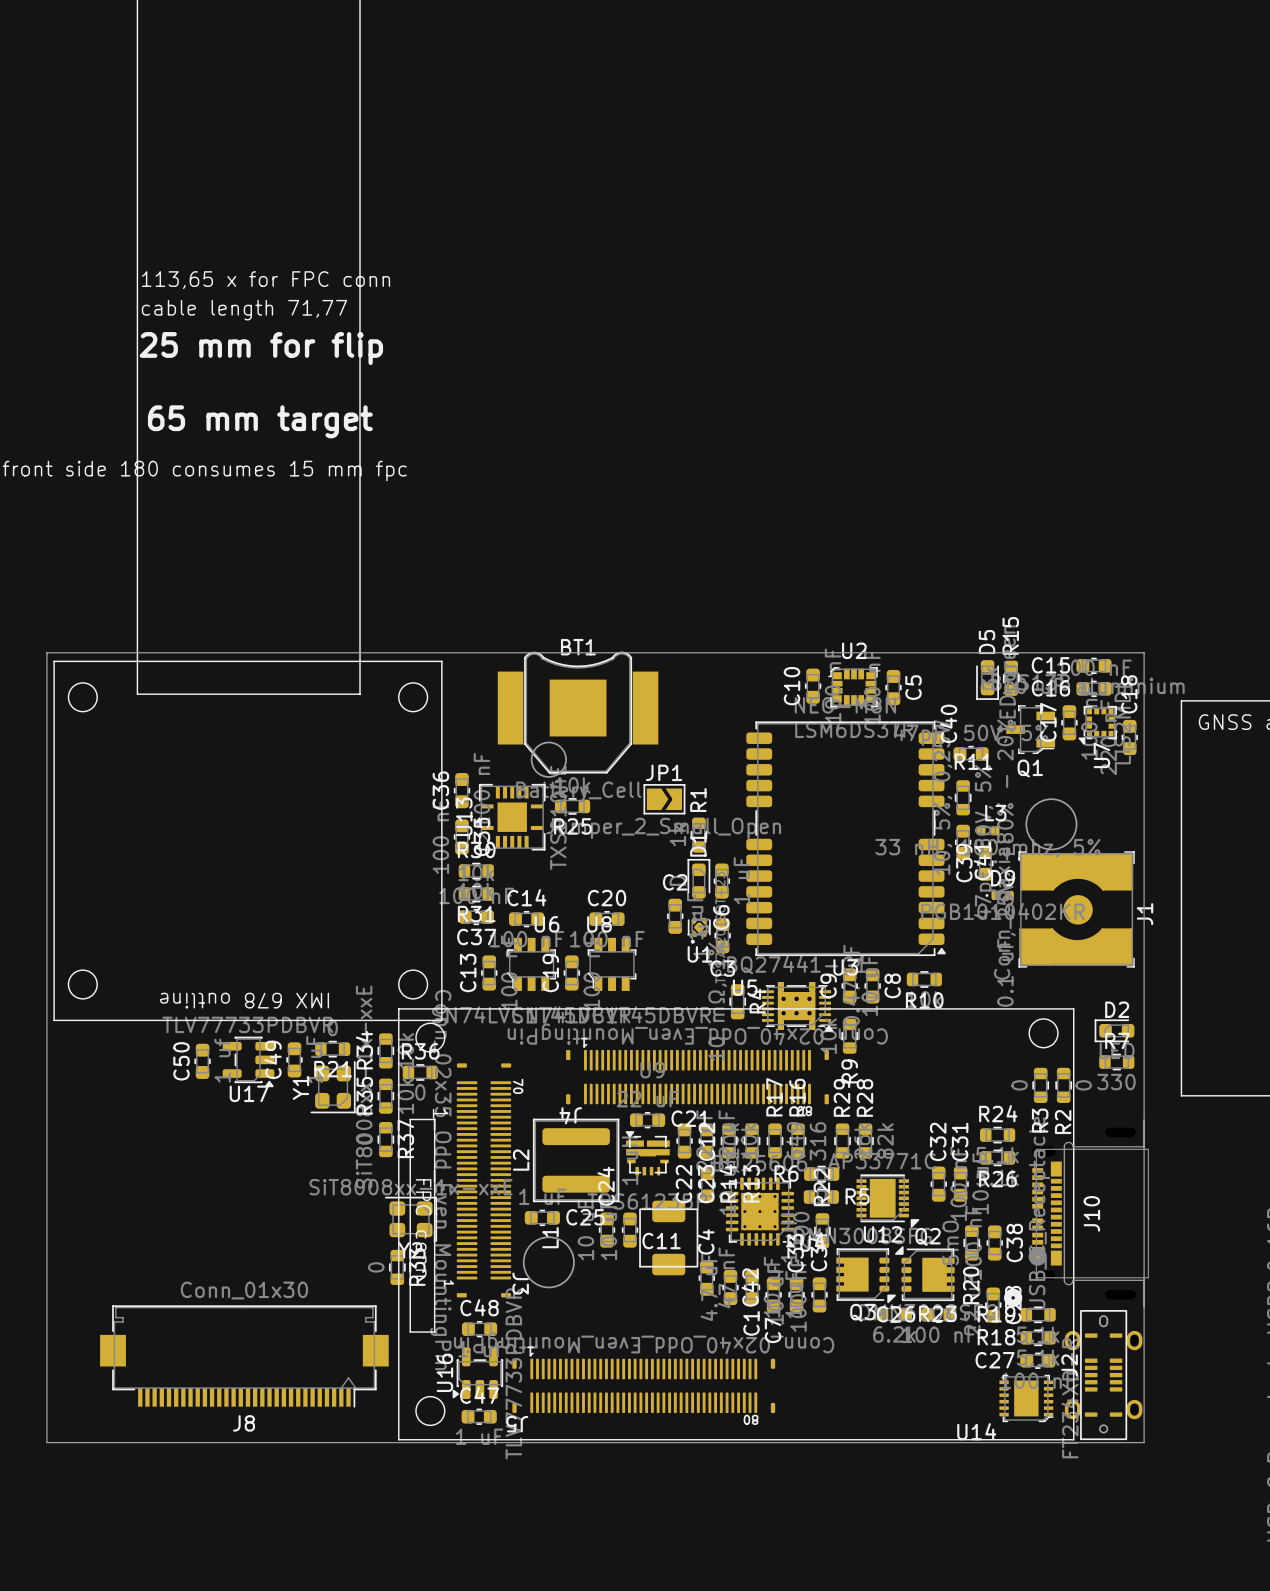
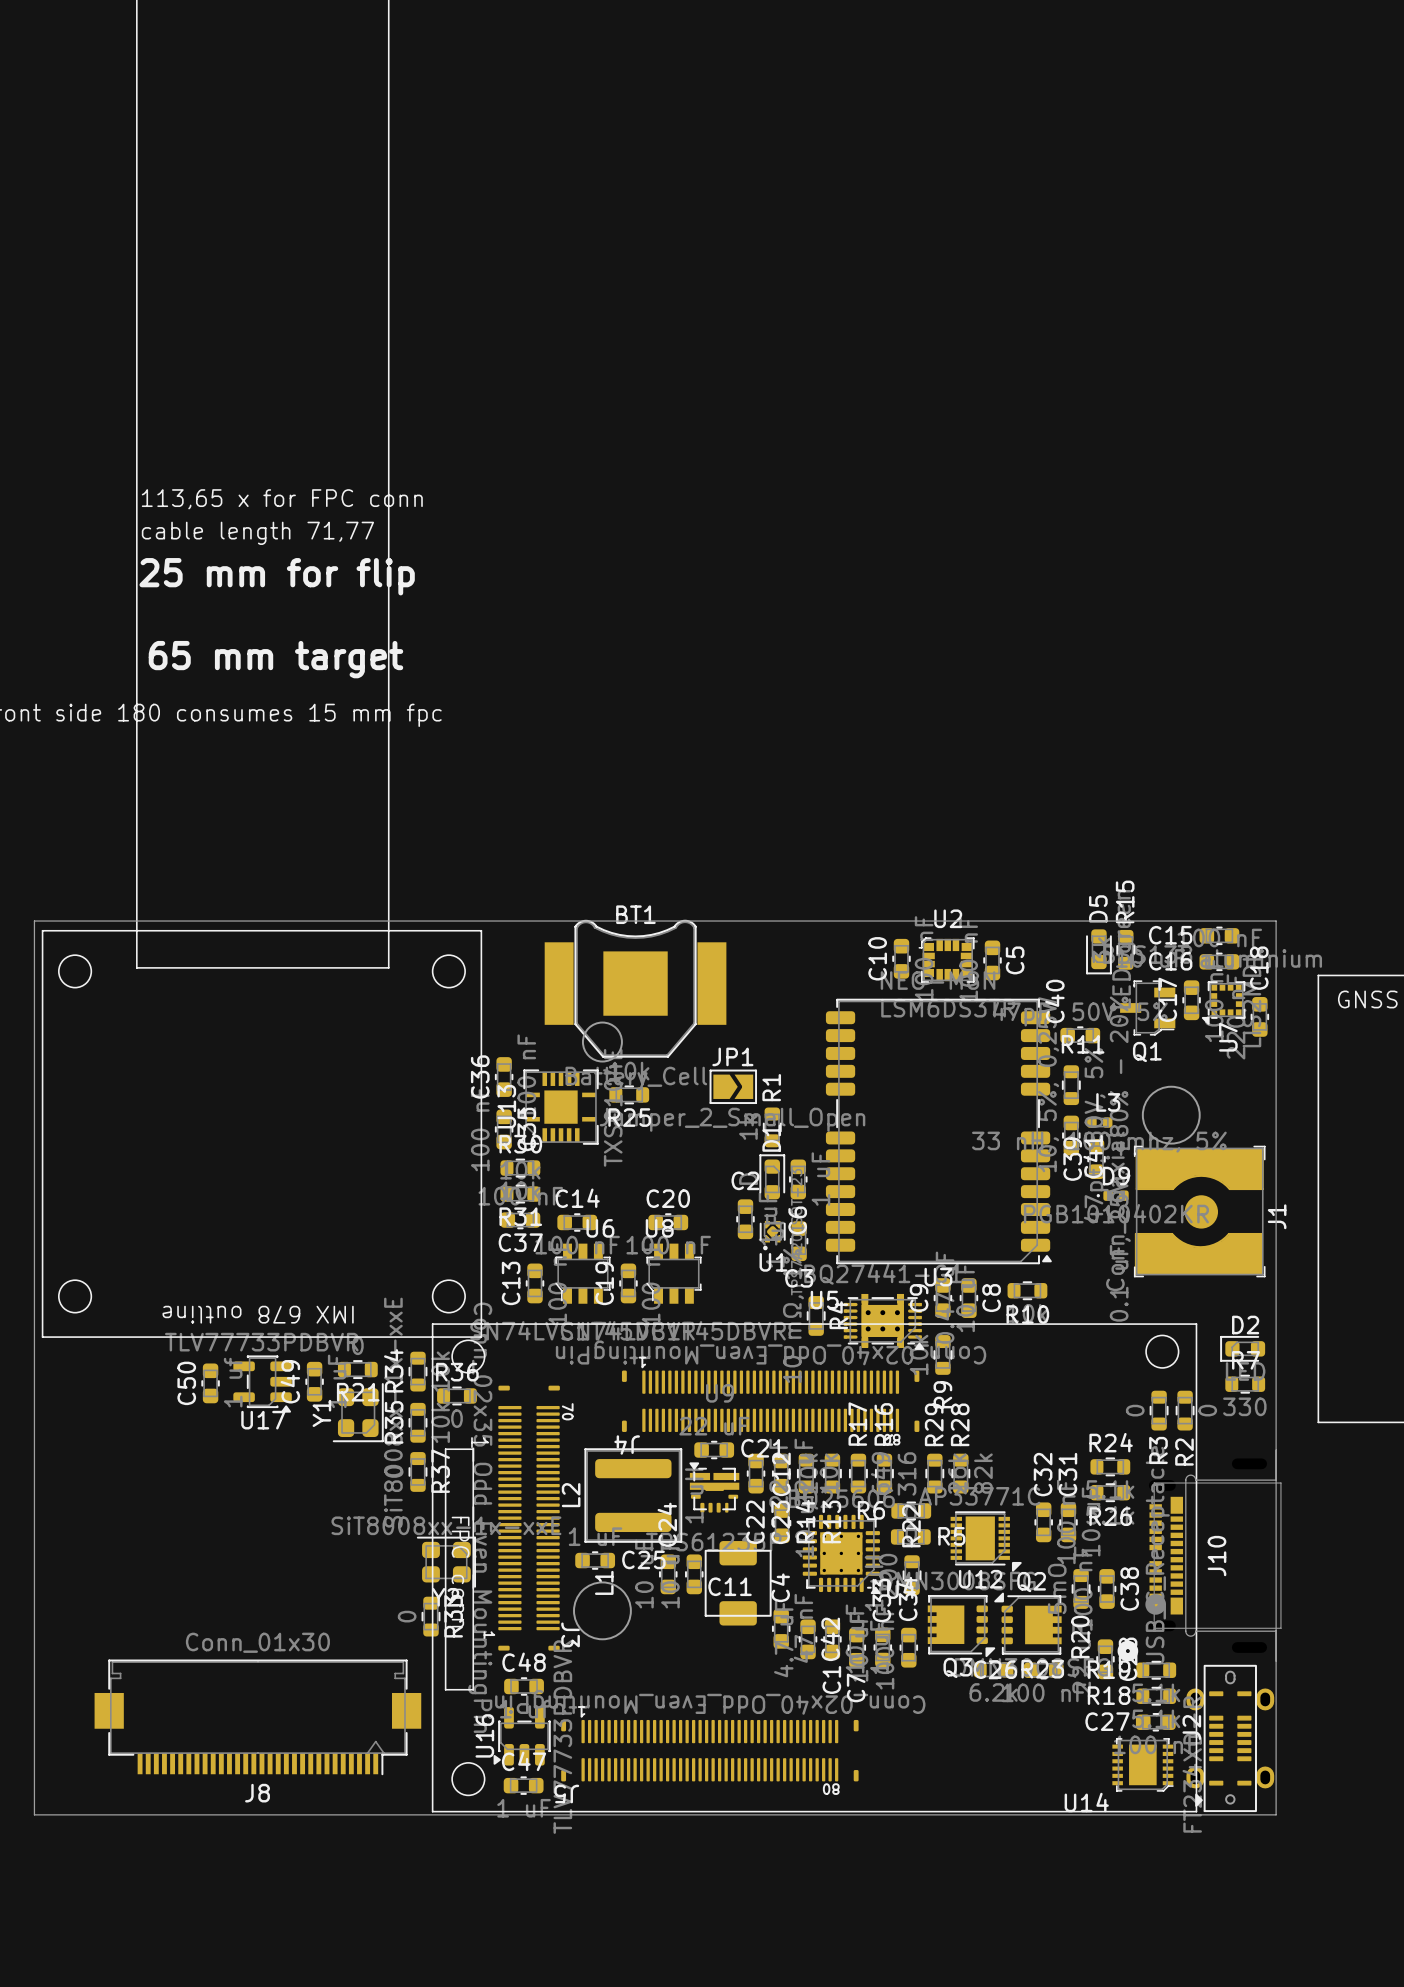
J2 footprint: [1064, 1310, 1143, 1441] -> [1186, 1664, 1275, 1813]

